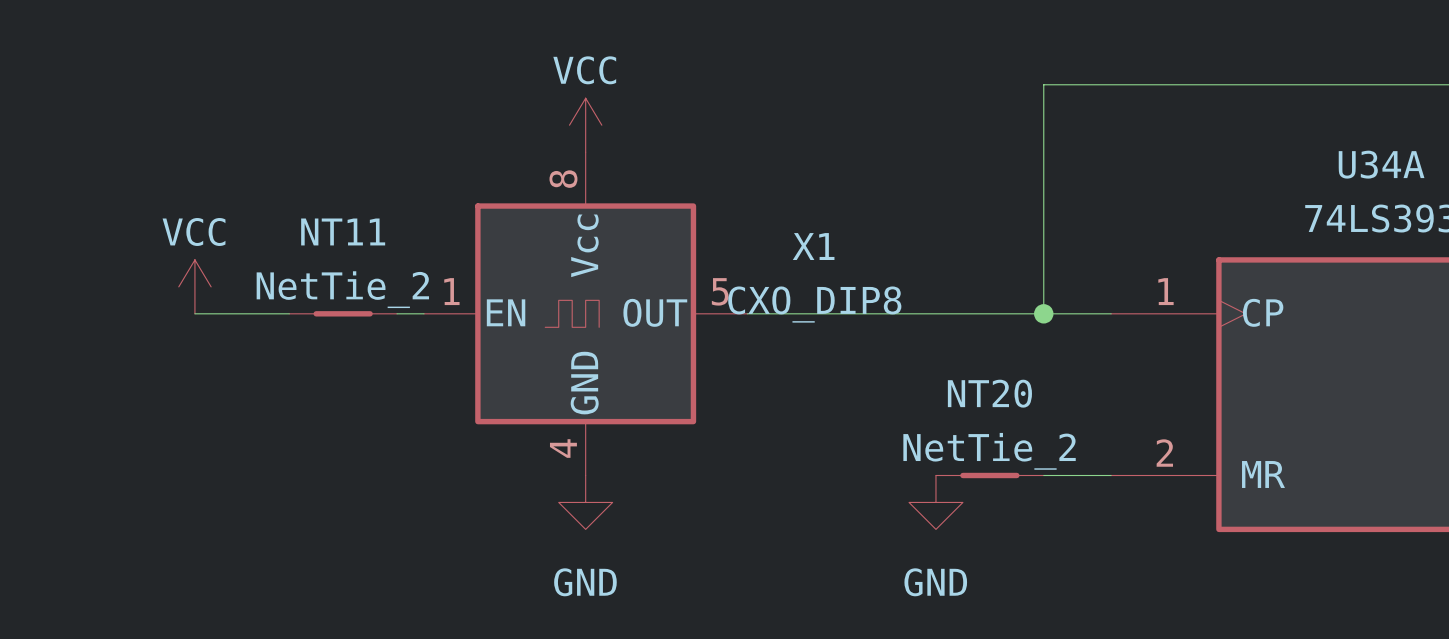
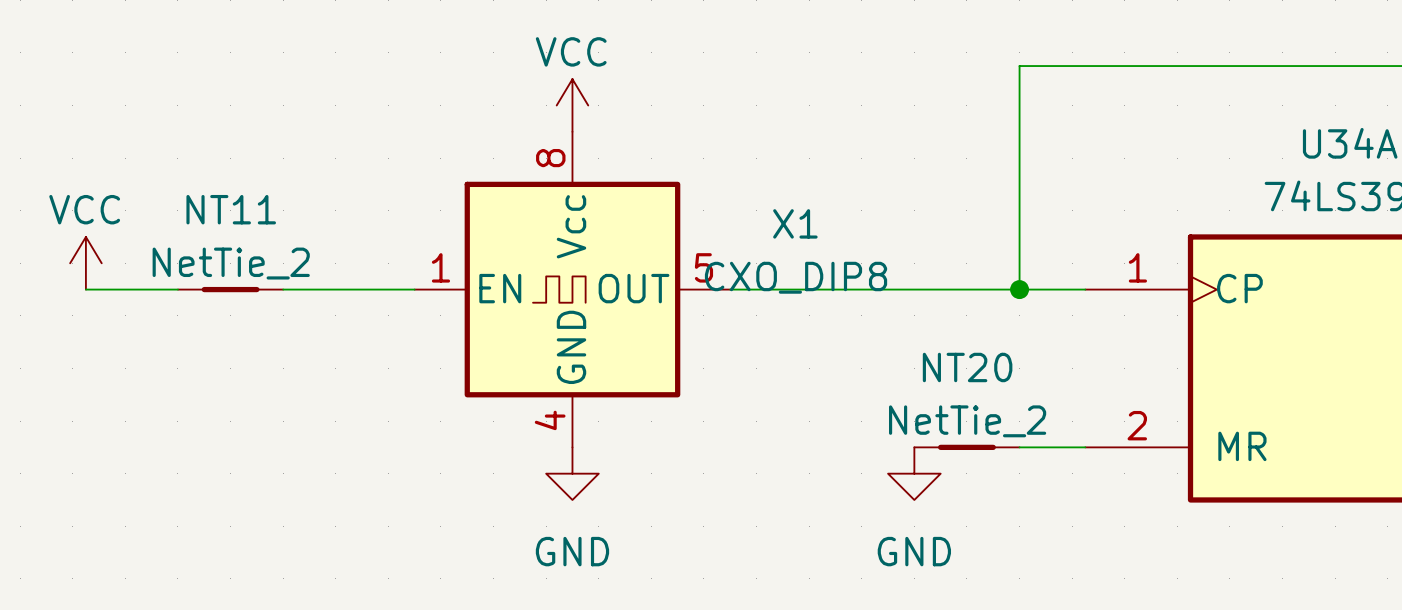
power symbol position: VCC (194, 286) -> VCC (85, 263)
wire: none -> (85, 289) (177, 289)
NT11 position: (343, 313) -> (230, 289)

